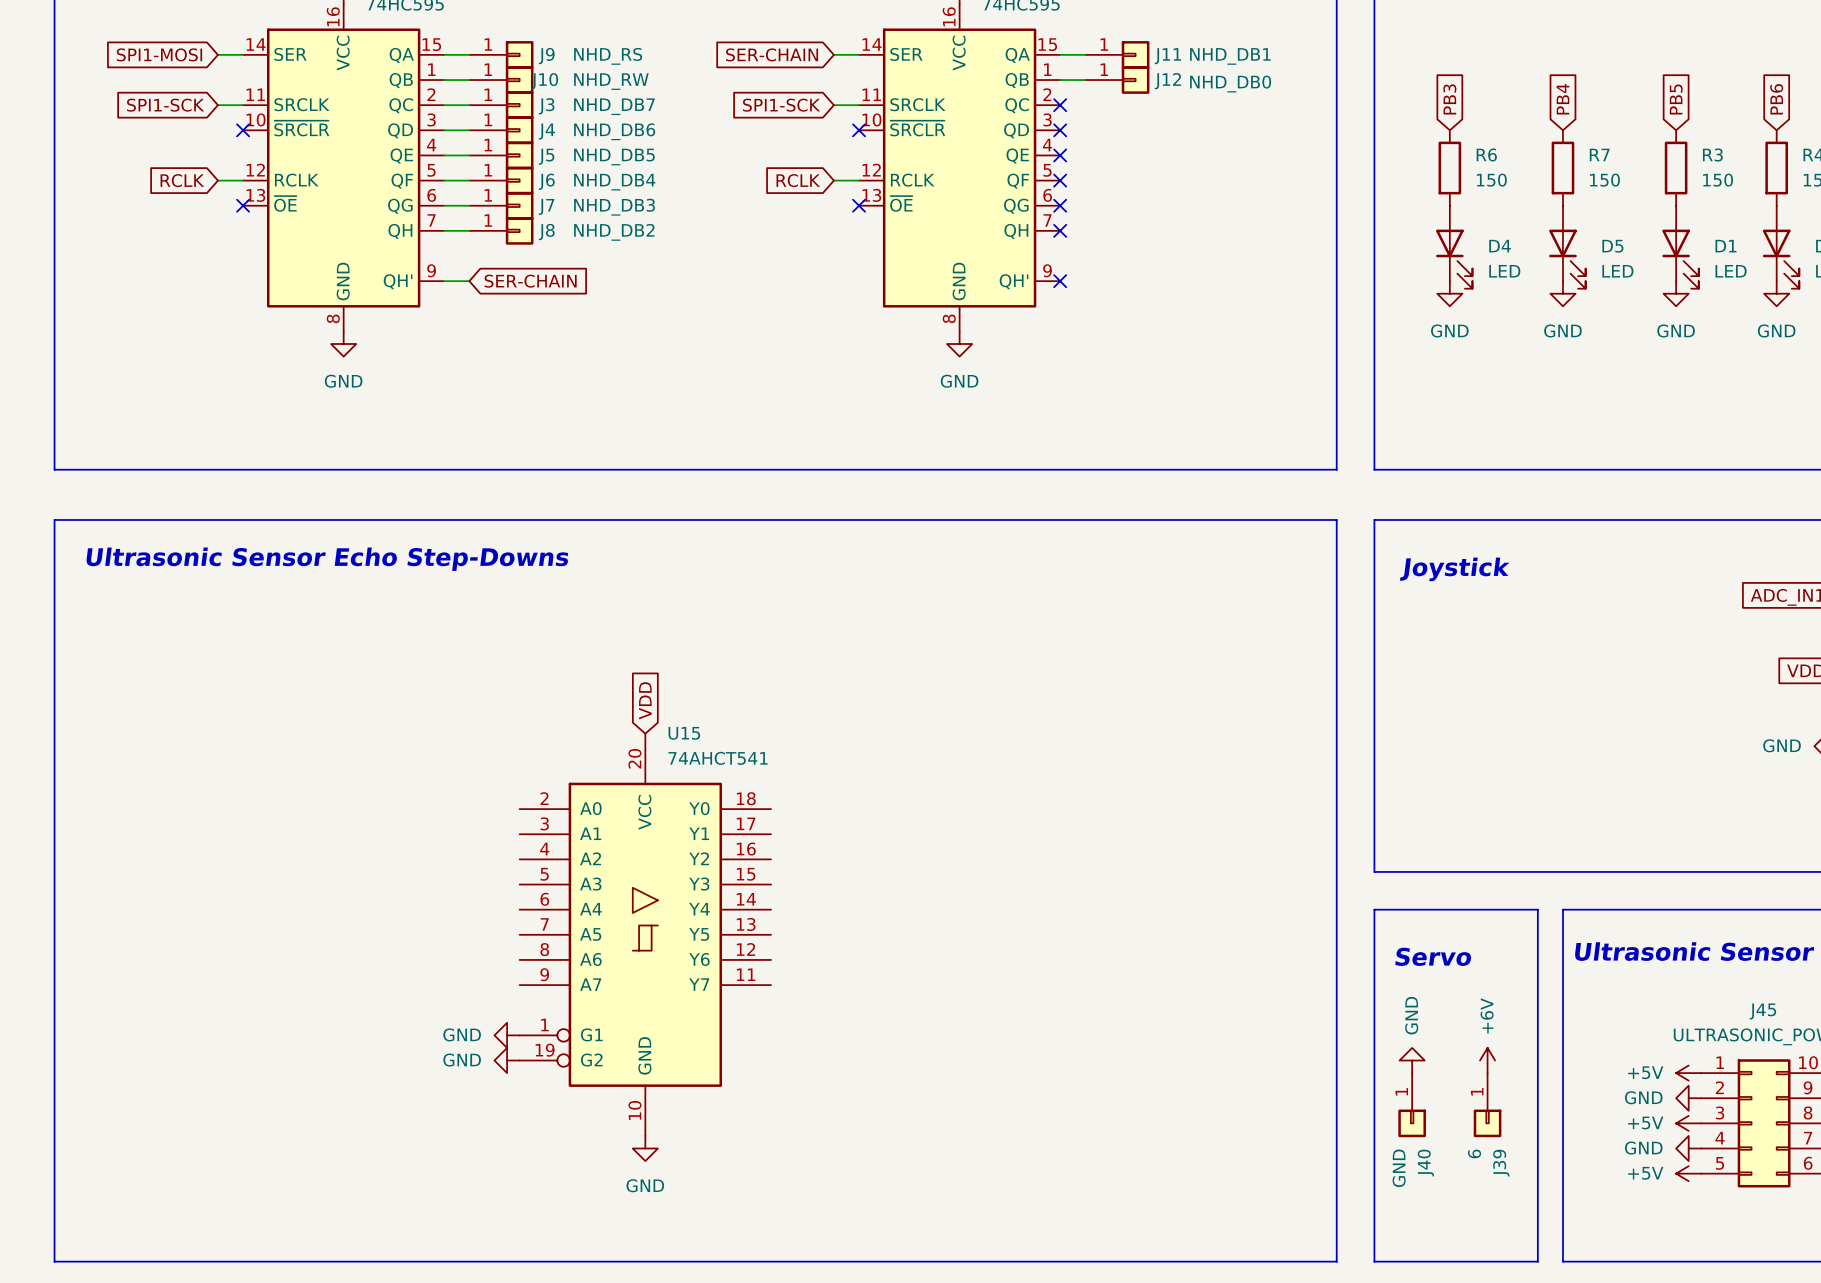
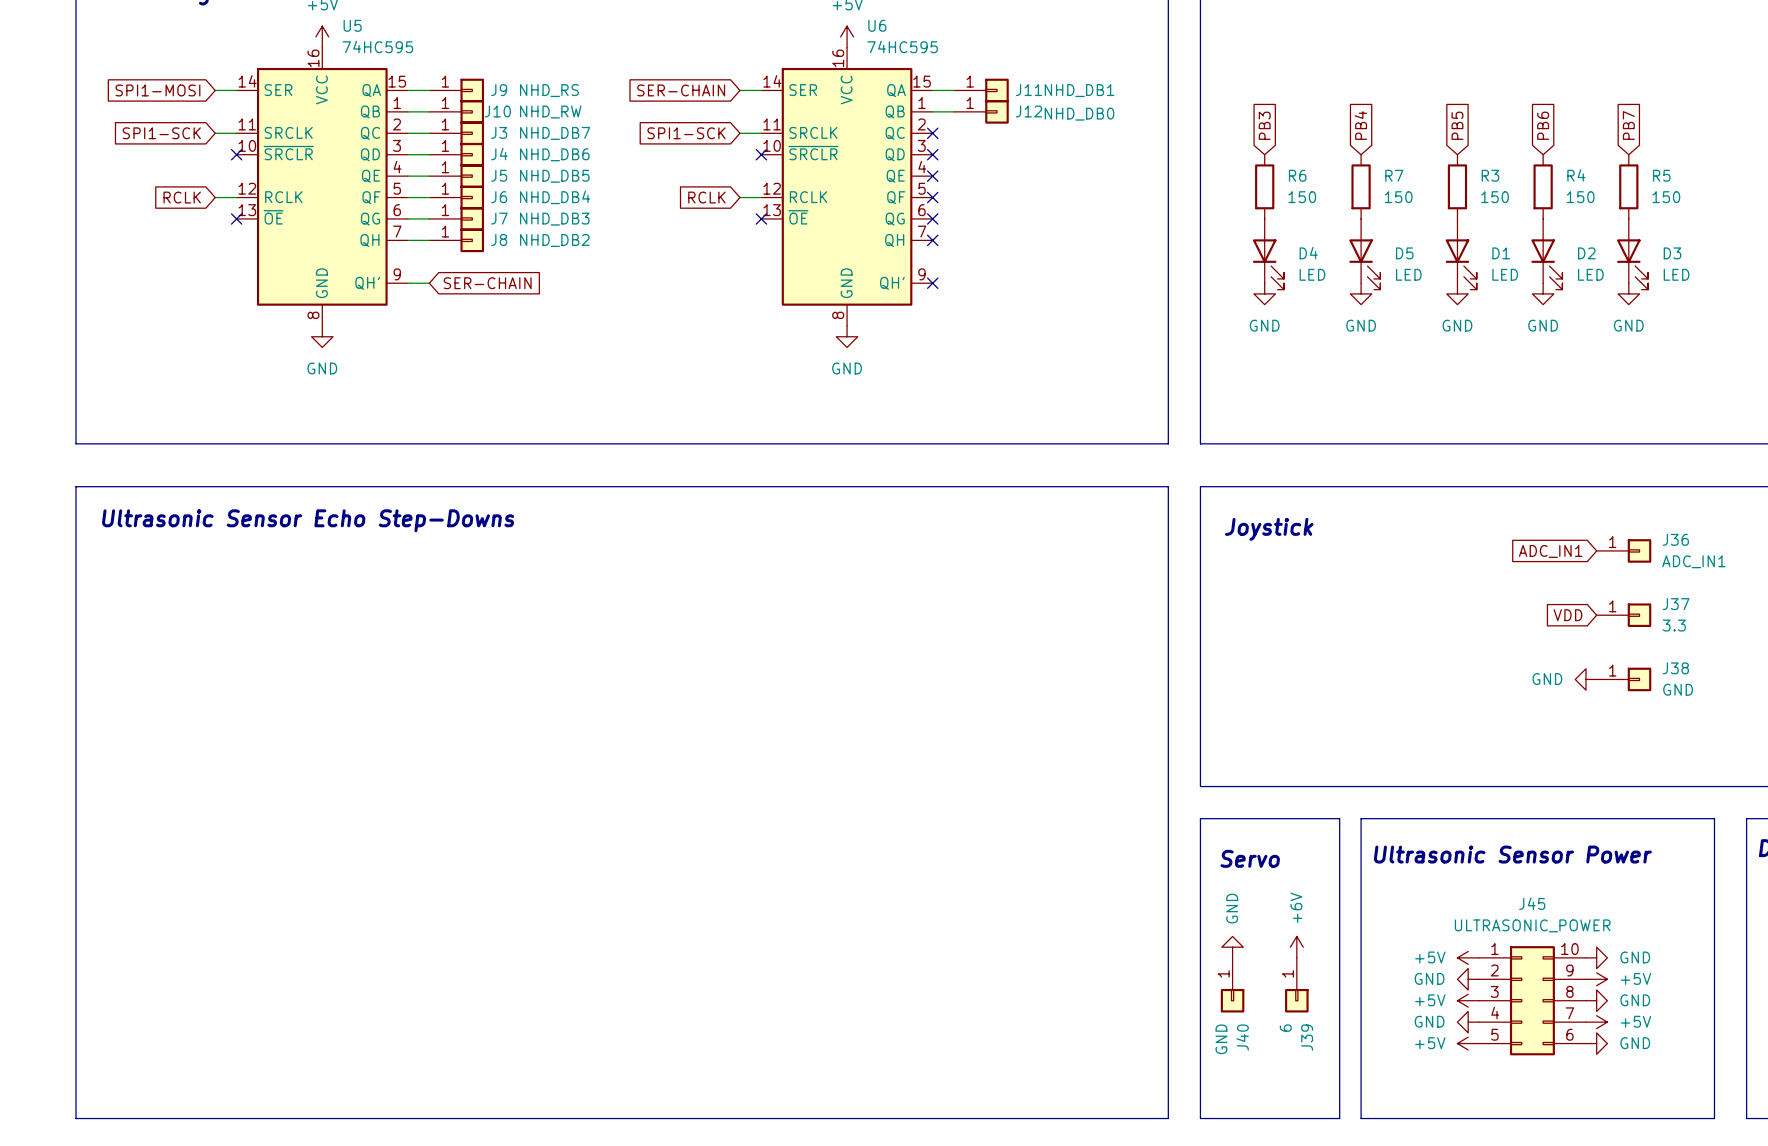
global label: VDD (645, 700) -> none
U15: 74AHCT541 (645, 934) -> none
power symbol: GND (507, 1035) -> none
power symbol: GND (507, 1060) -> none
power symbol: GND (645, 1148) -> none

